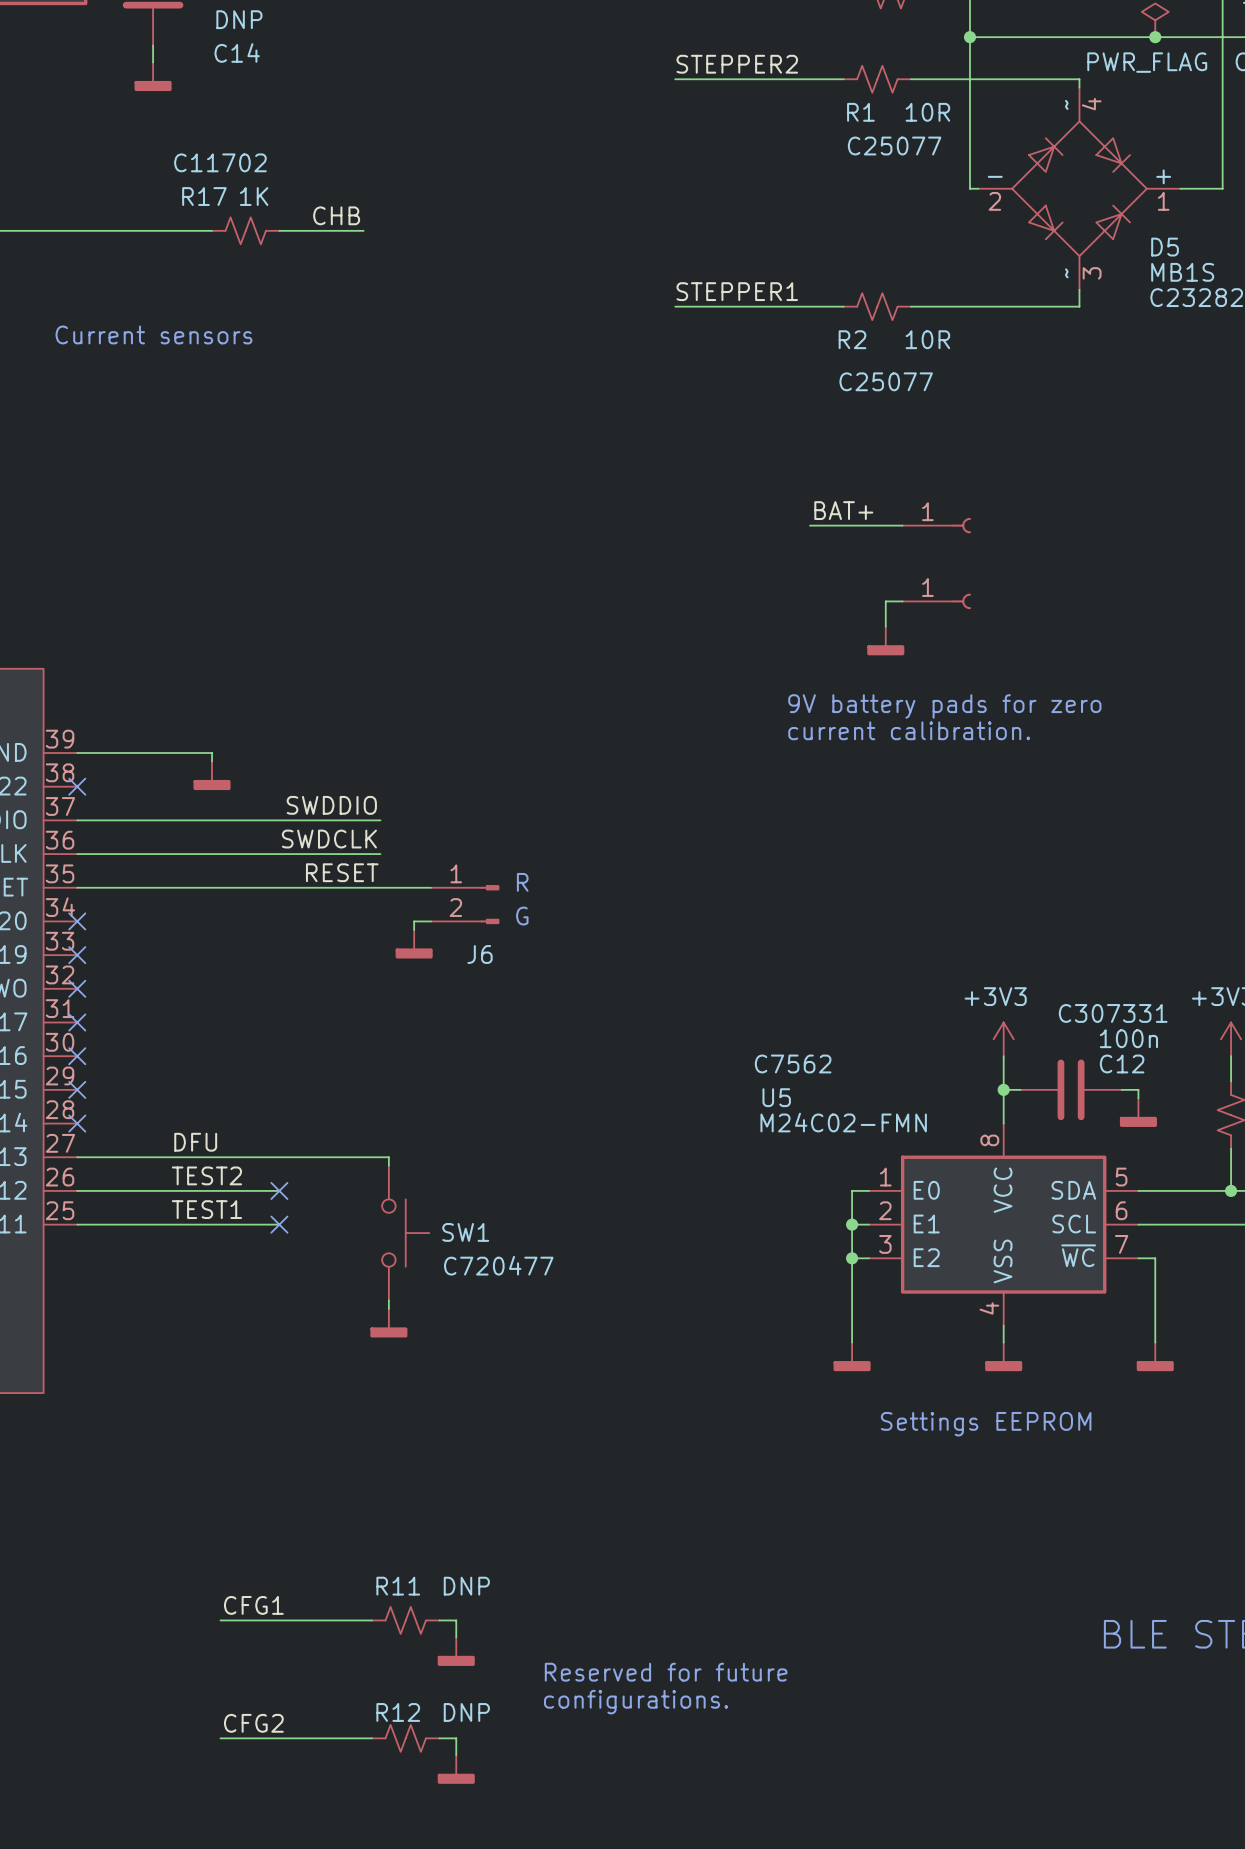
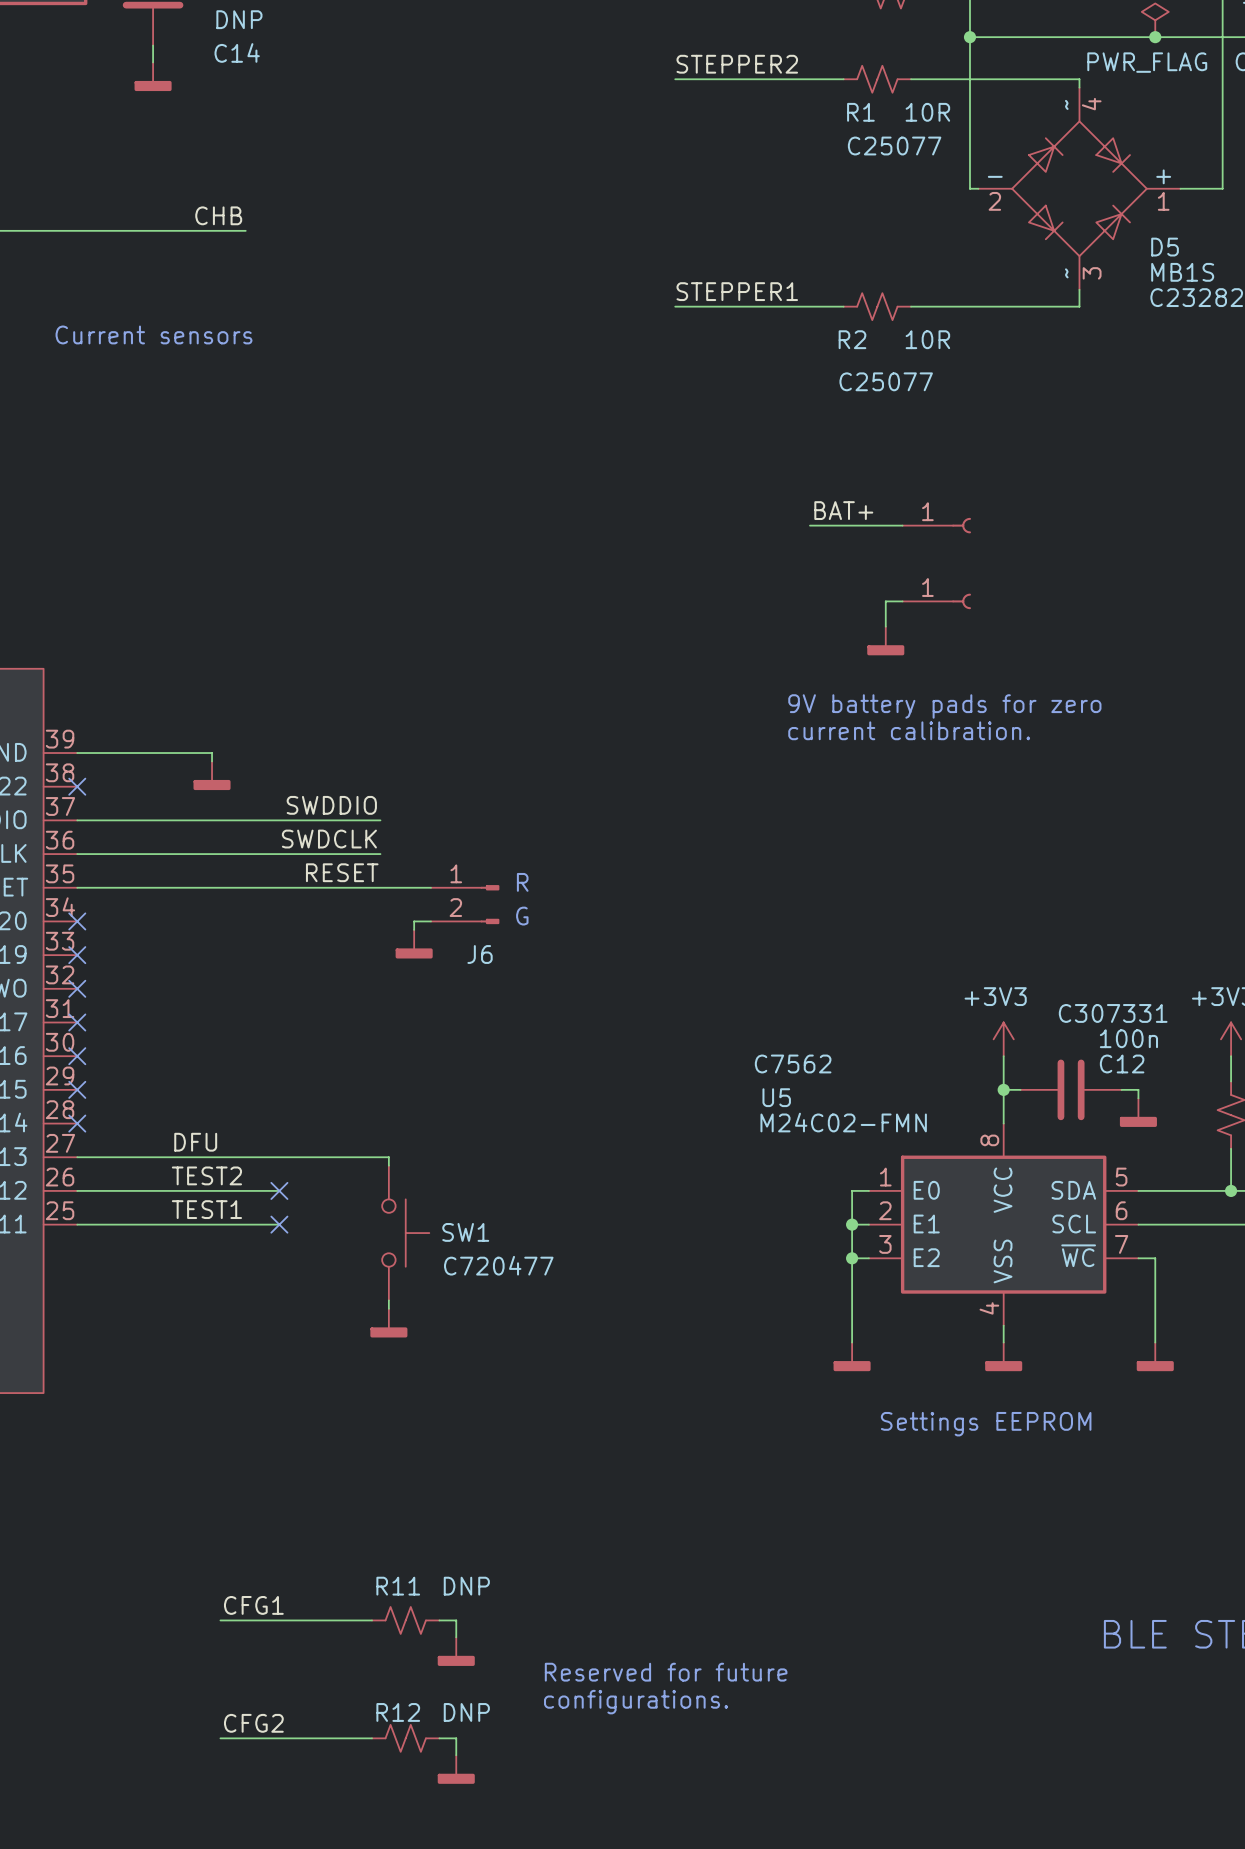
label position: CHB (336, 215) -> CHB (218, 215)
R17: 1K (245, 230) -> none
wire: (279, 230) (363, 230) -> none

